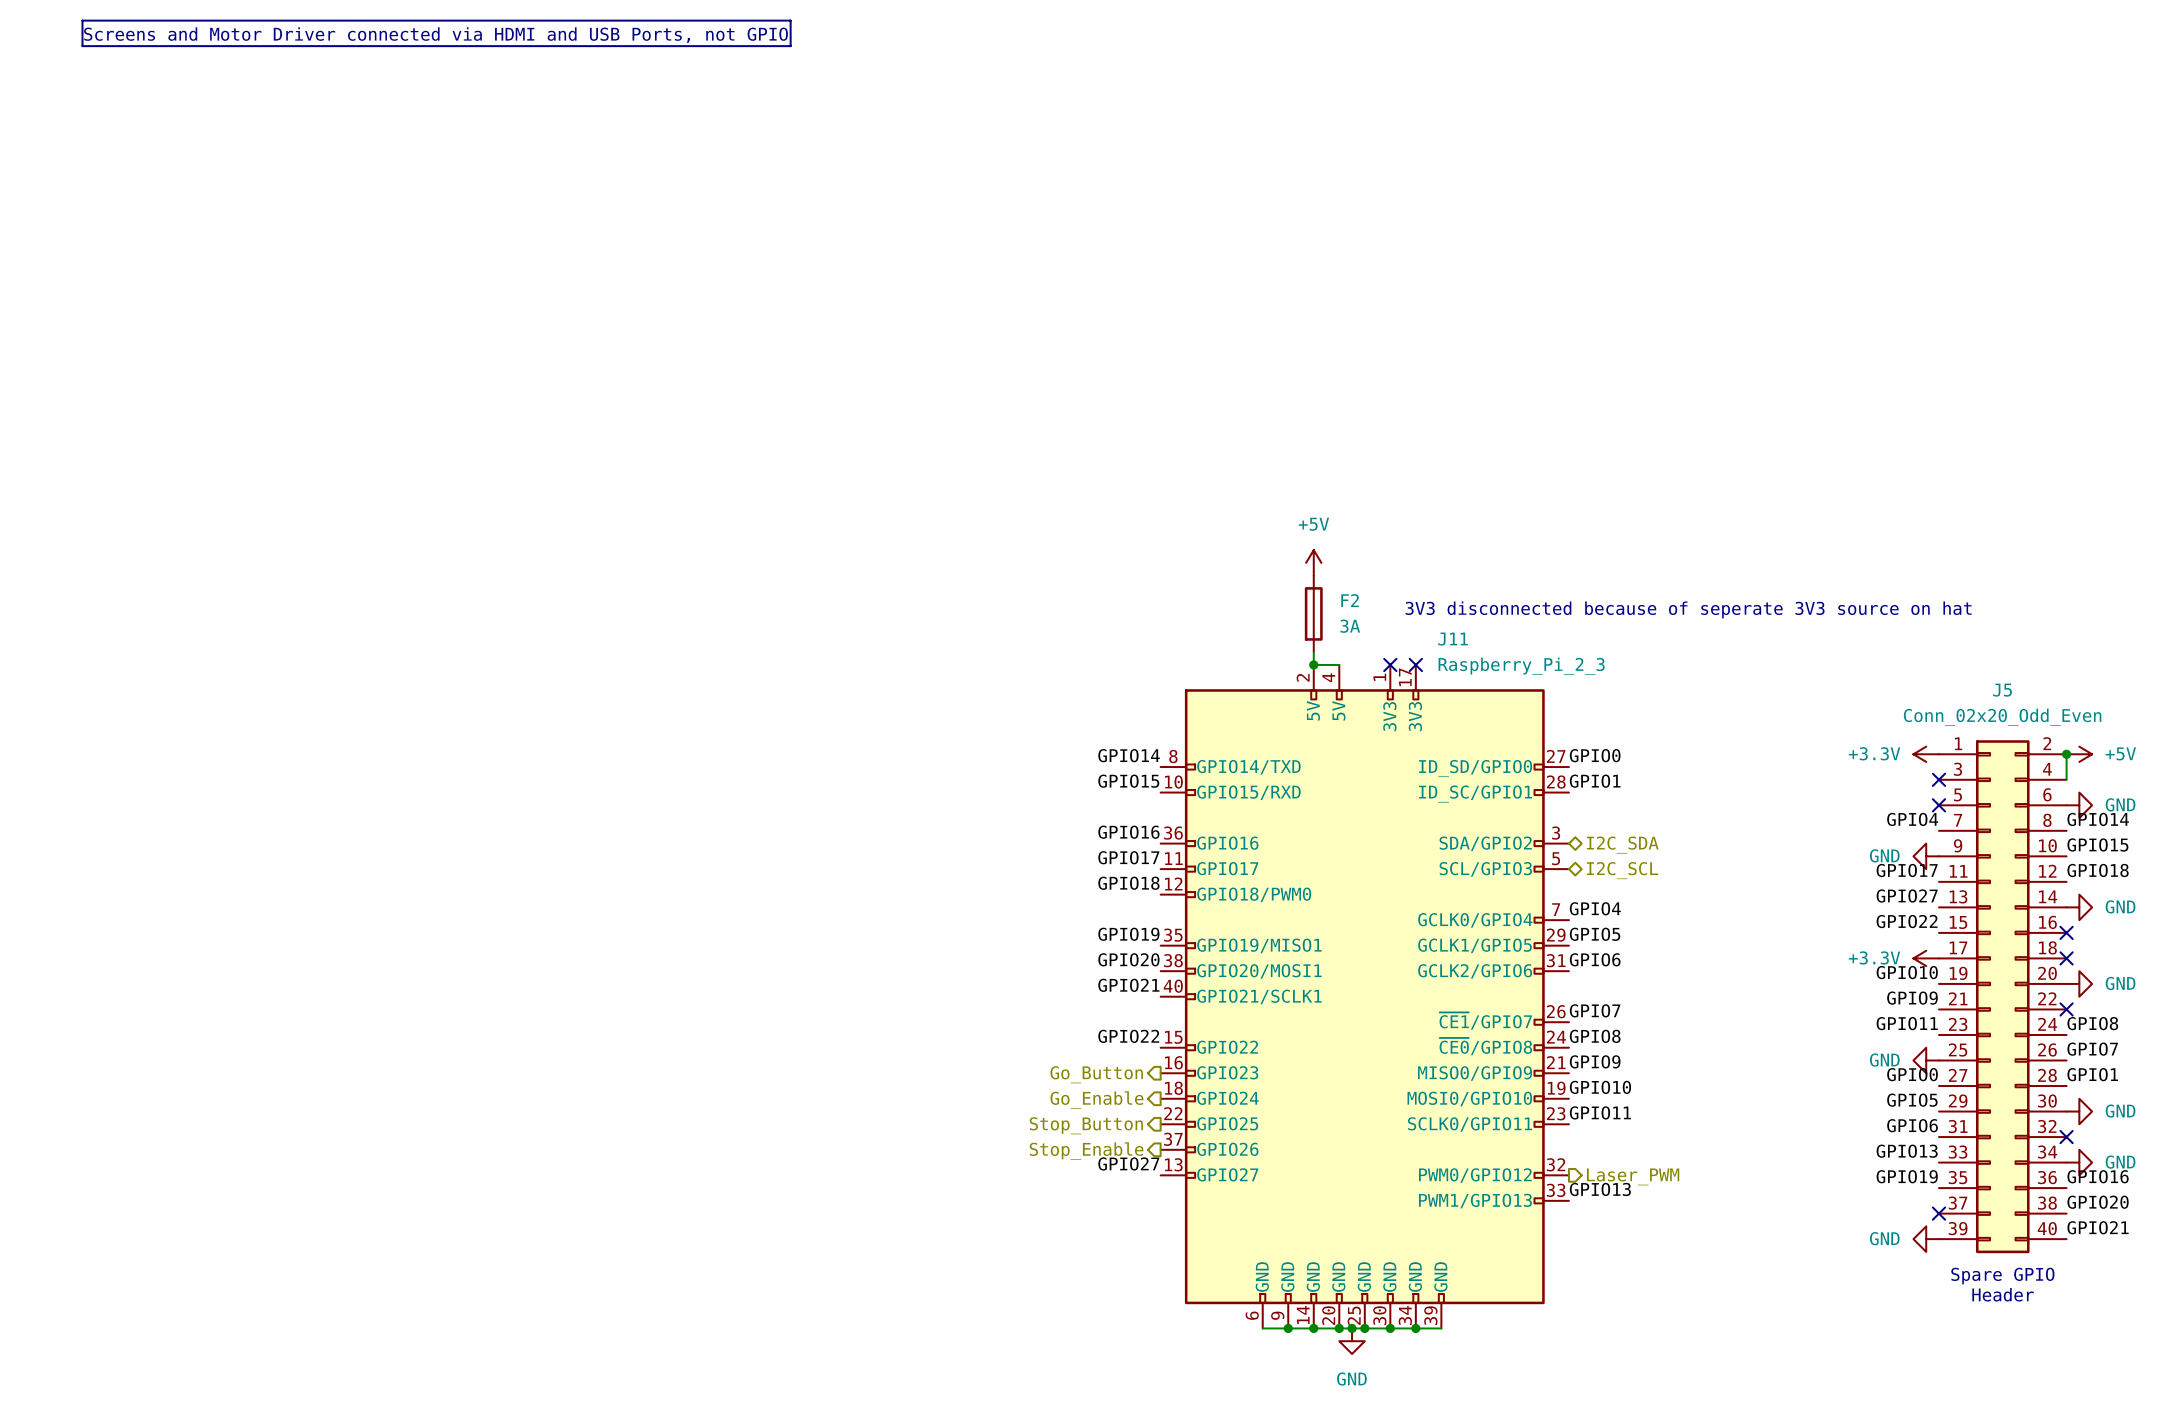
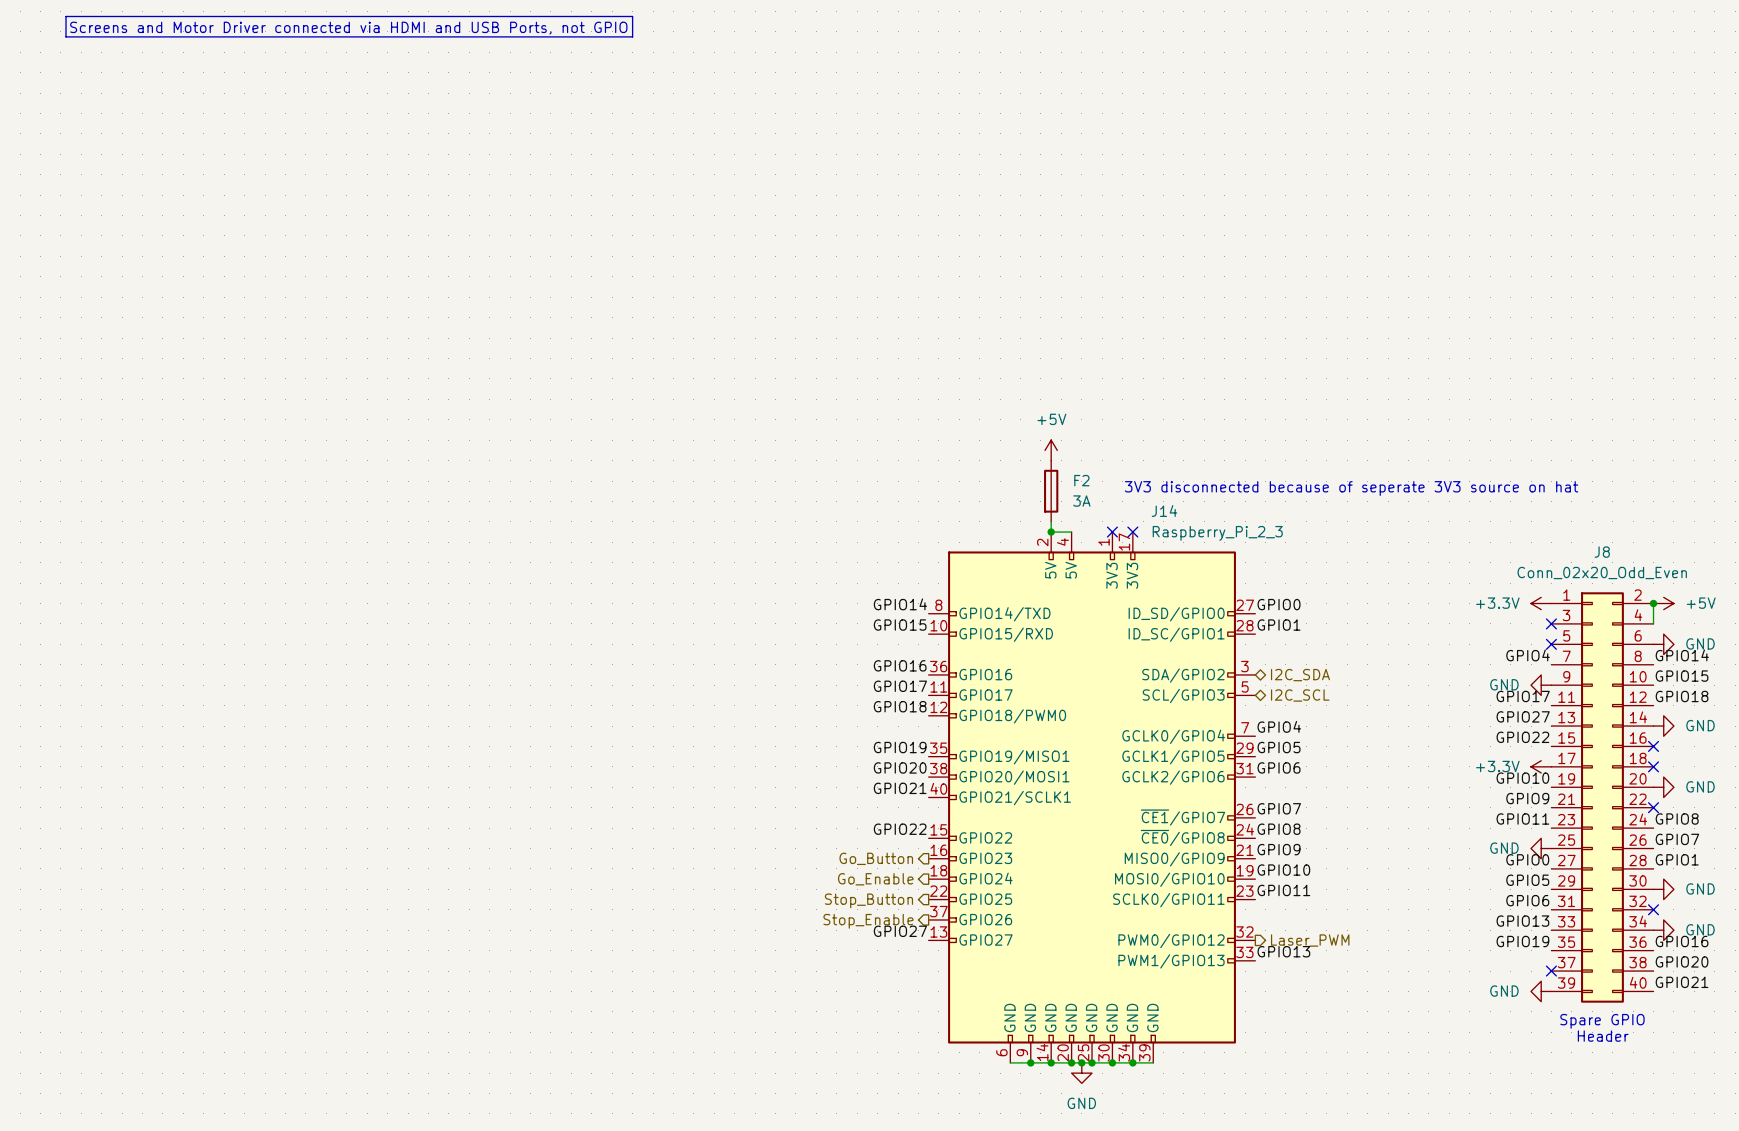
J11 name: J11 (1453, 639) -> J14 (1164, 511)
J5 name: J5 (2002, 690) -> J8 (1602, 552)

